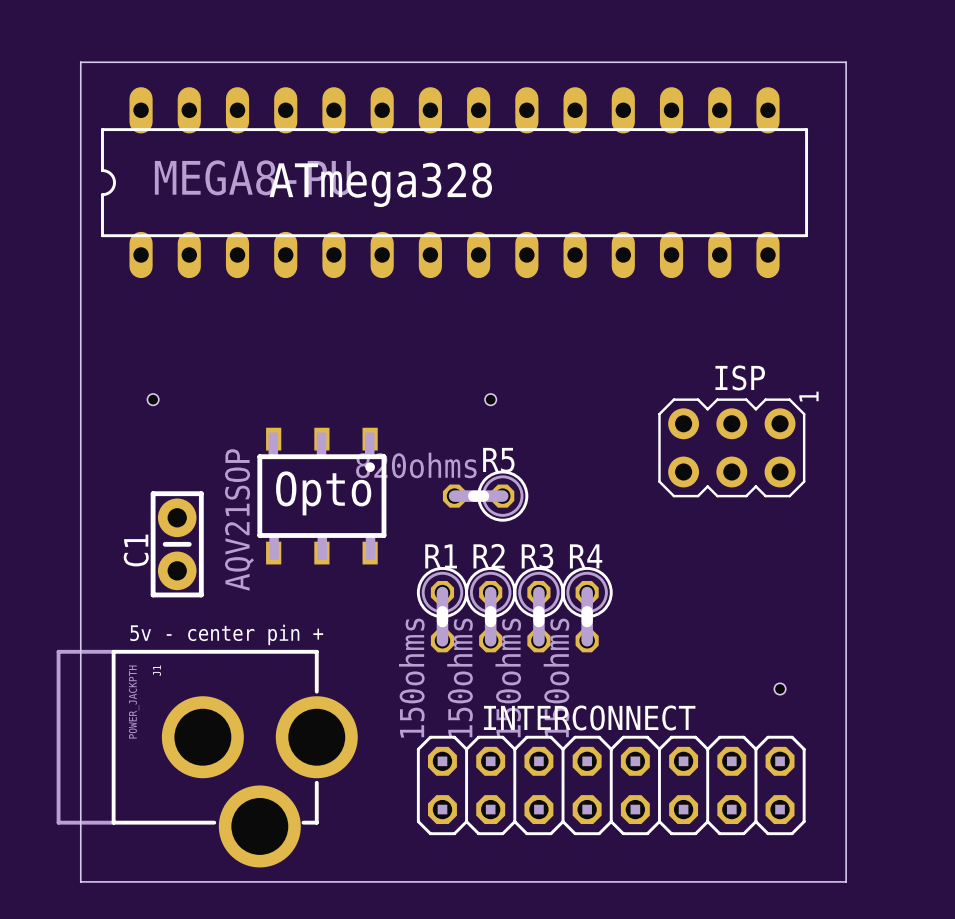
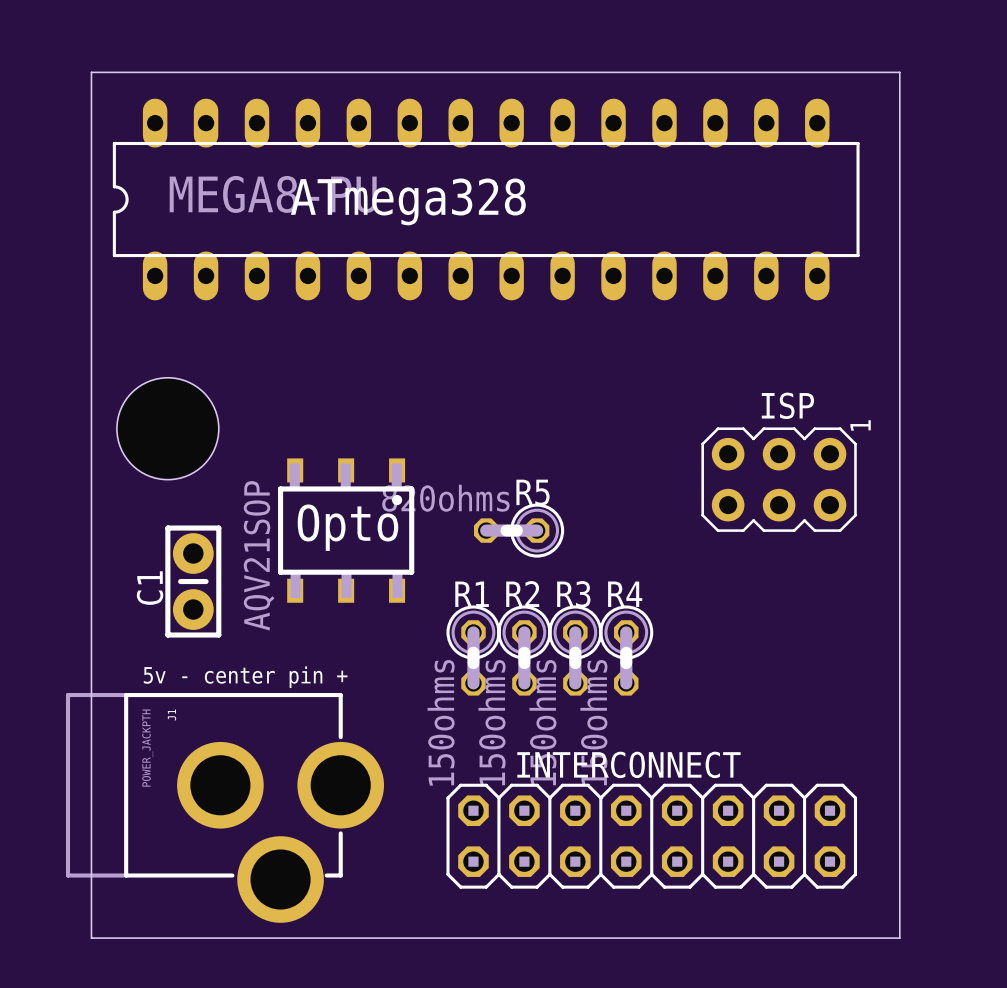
hole size: [147, 393, 159, 406] -> [116, 377, 219, 480]
hole: (490, 399) -> none
hole: (780, 689) -> none

